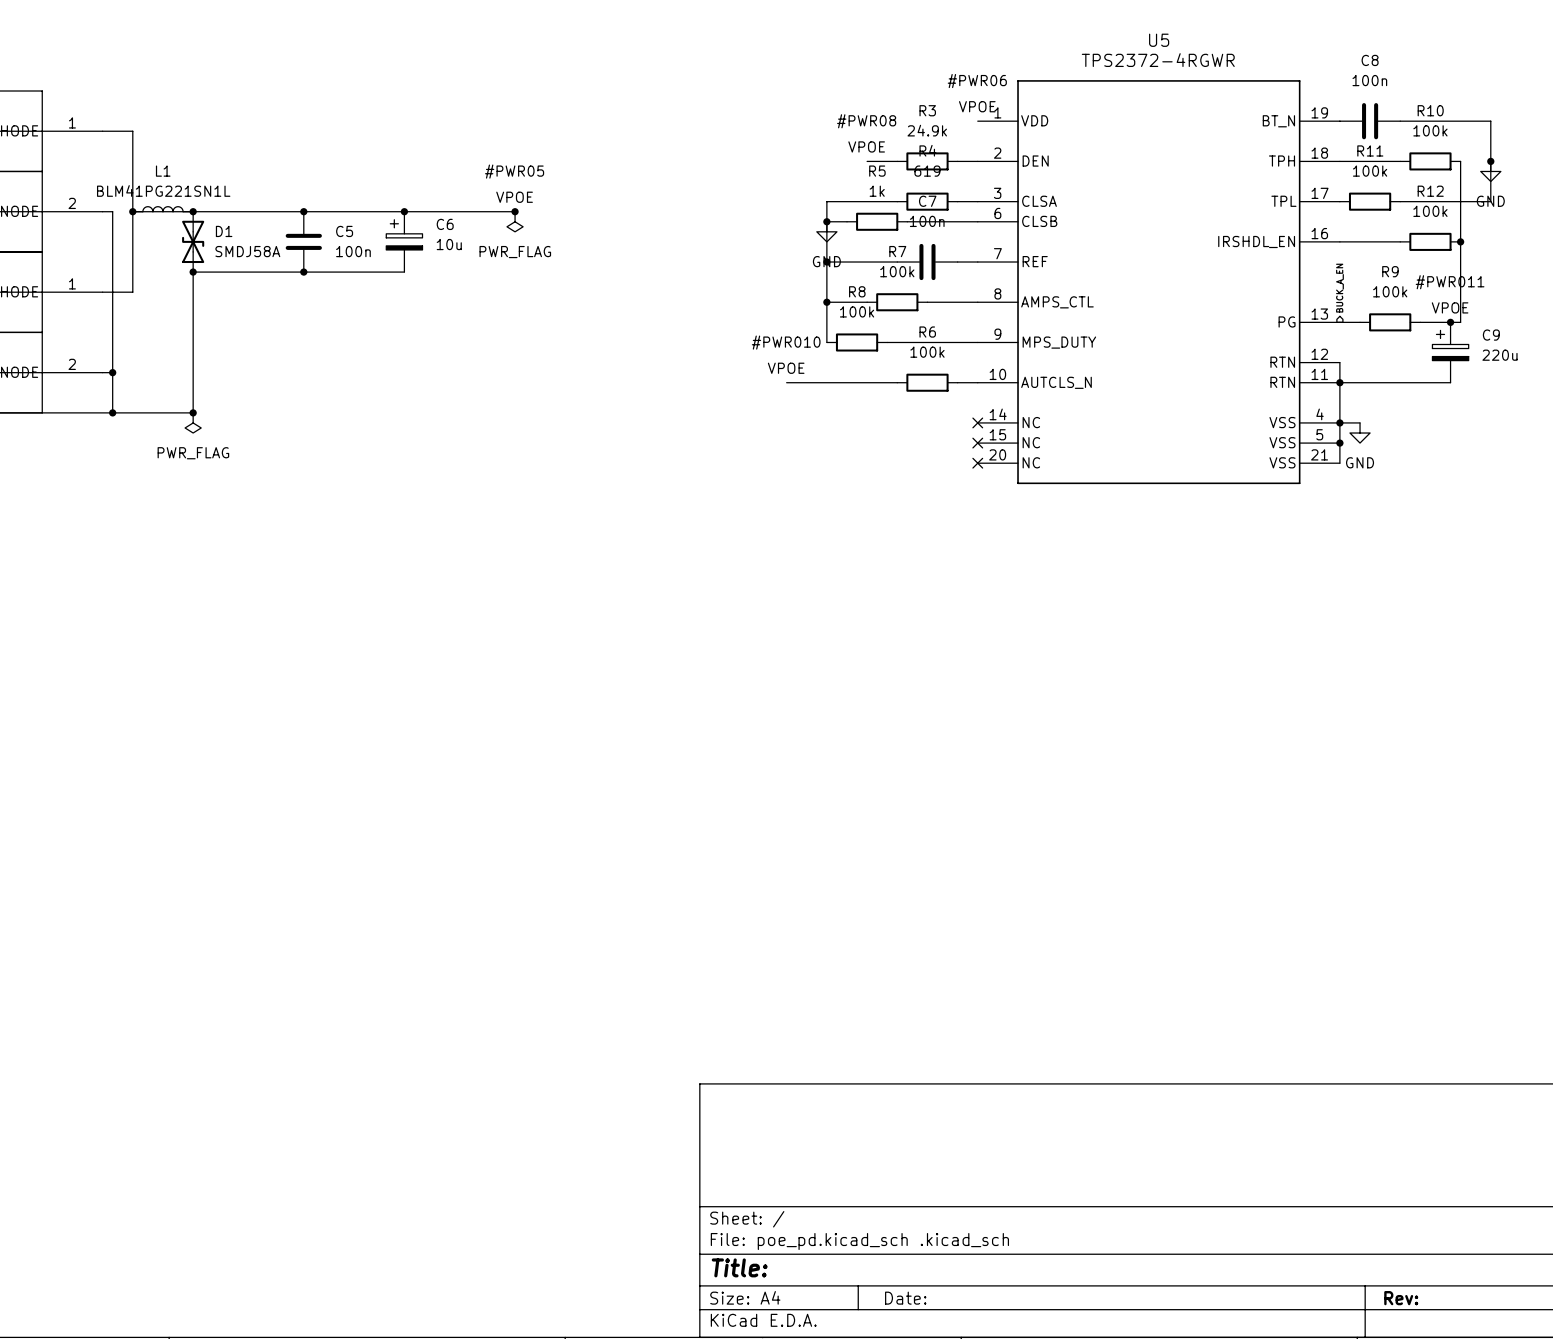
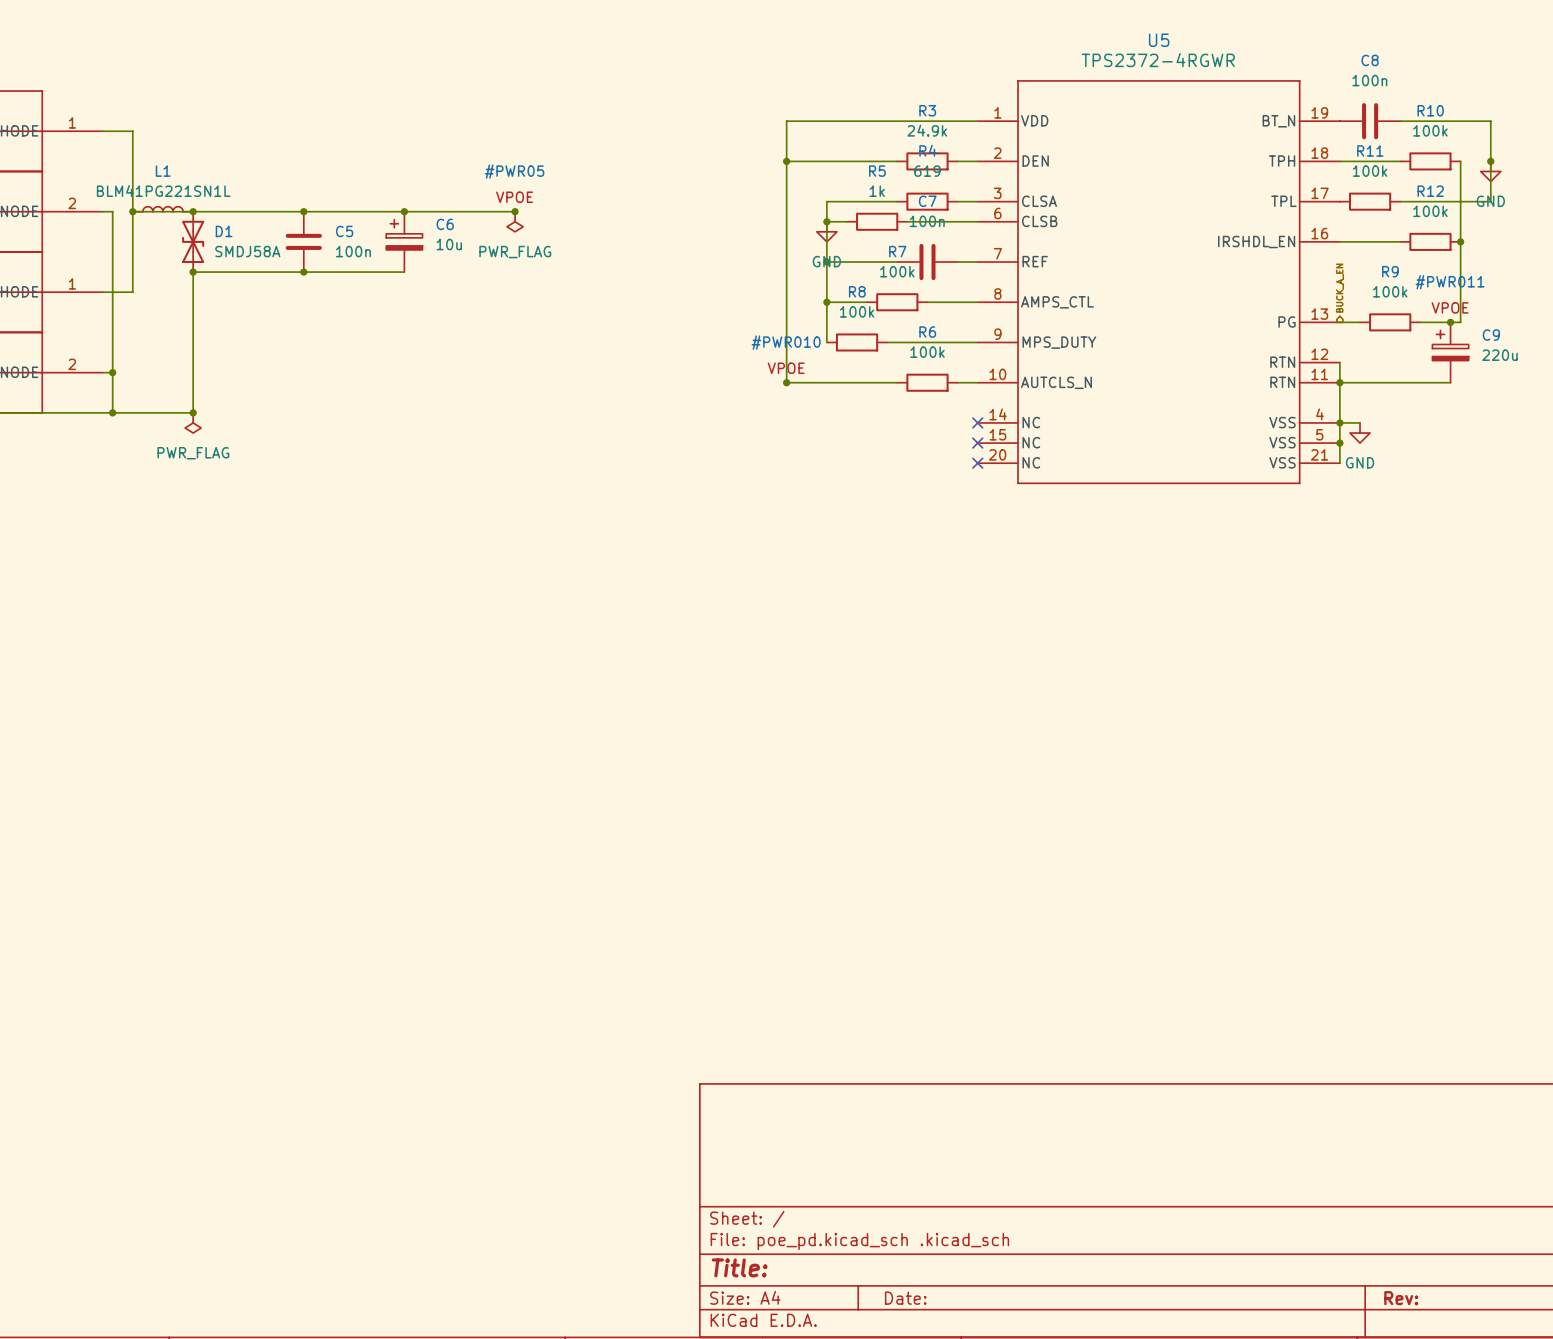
#PWR06: (977, 93) -> none
wire: none -> (977, 121) (786, 121) (786, 382)
#PWR08: (866, 133) -> none
wire: none -> (786, 161) (867, 161)
junction: none -> (786, 161)
junction: none -> (786, 382)

